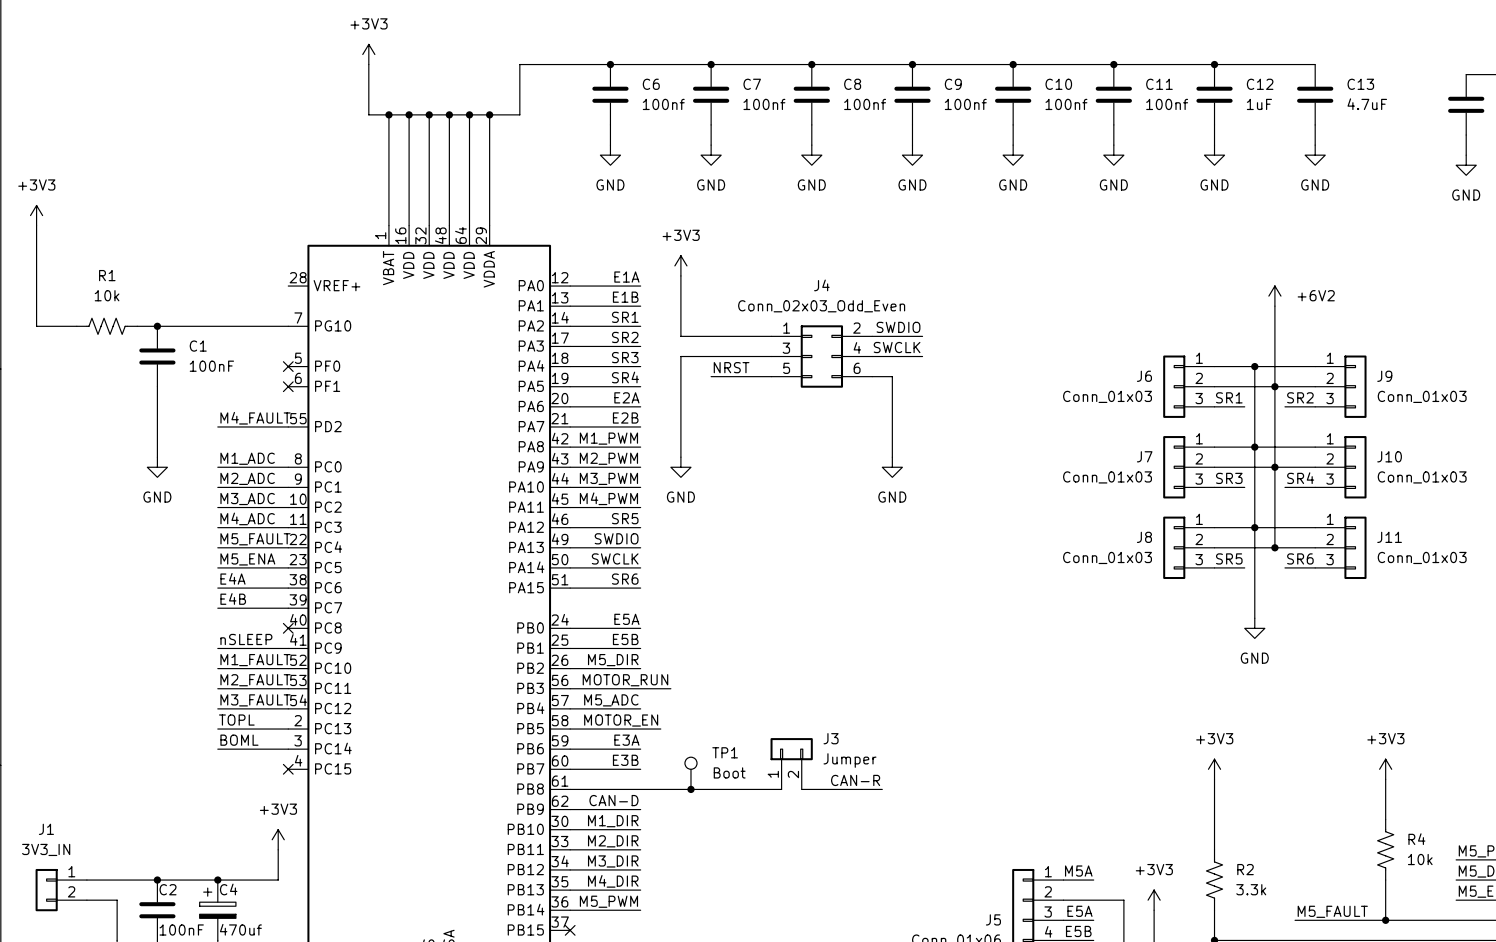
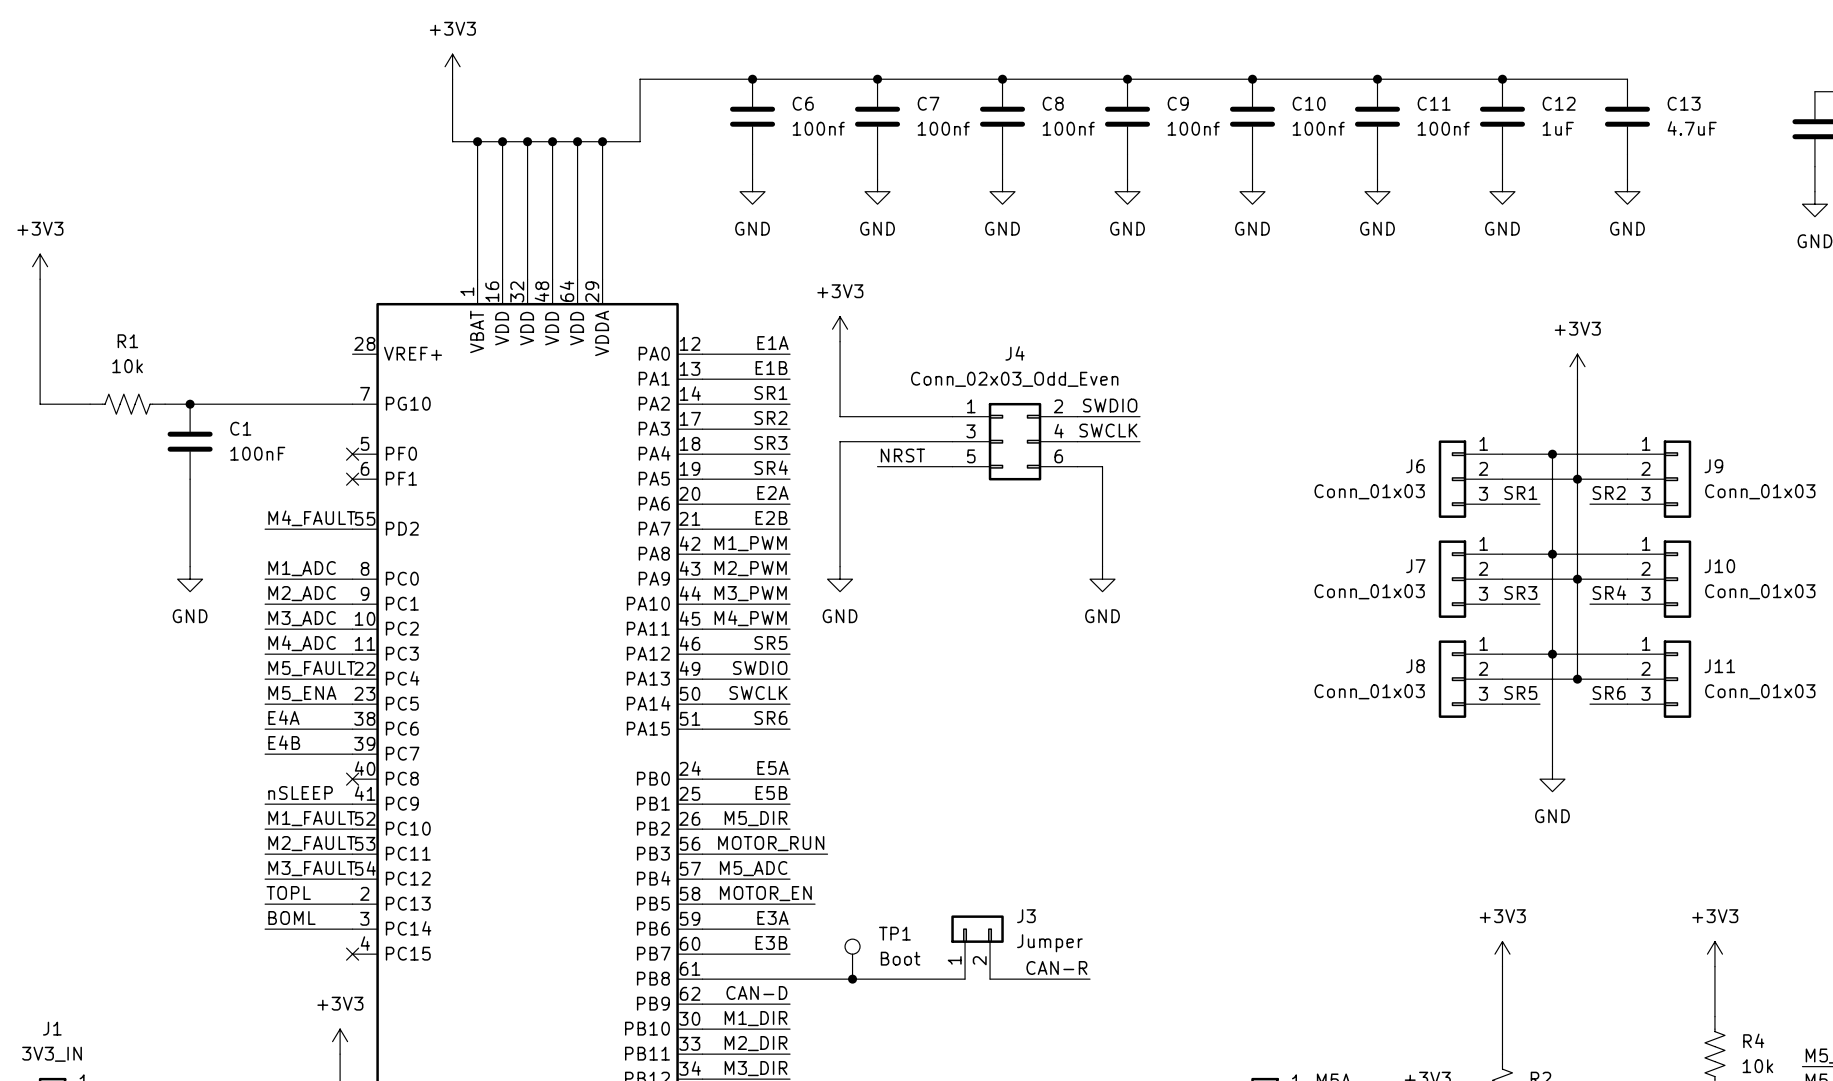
power symbol: +6V2 (1274, 296) -> +3V3 (1577, 366)

